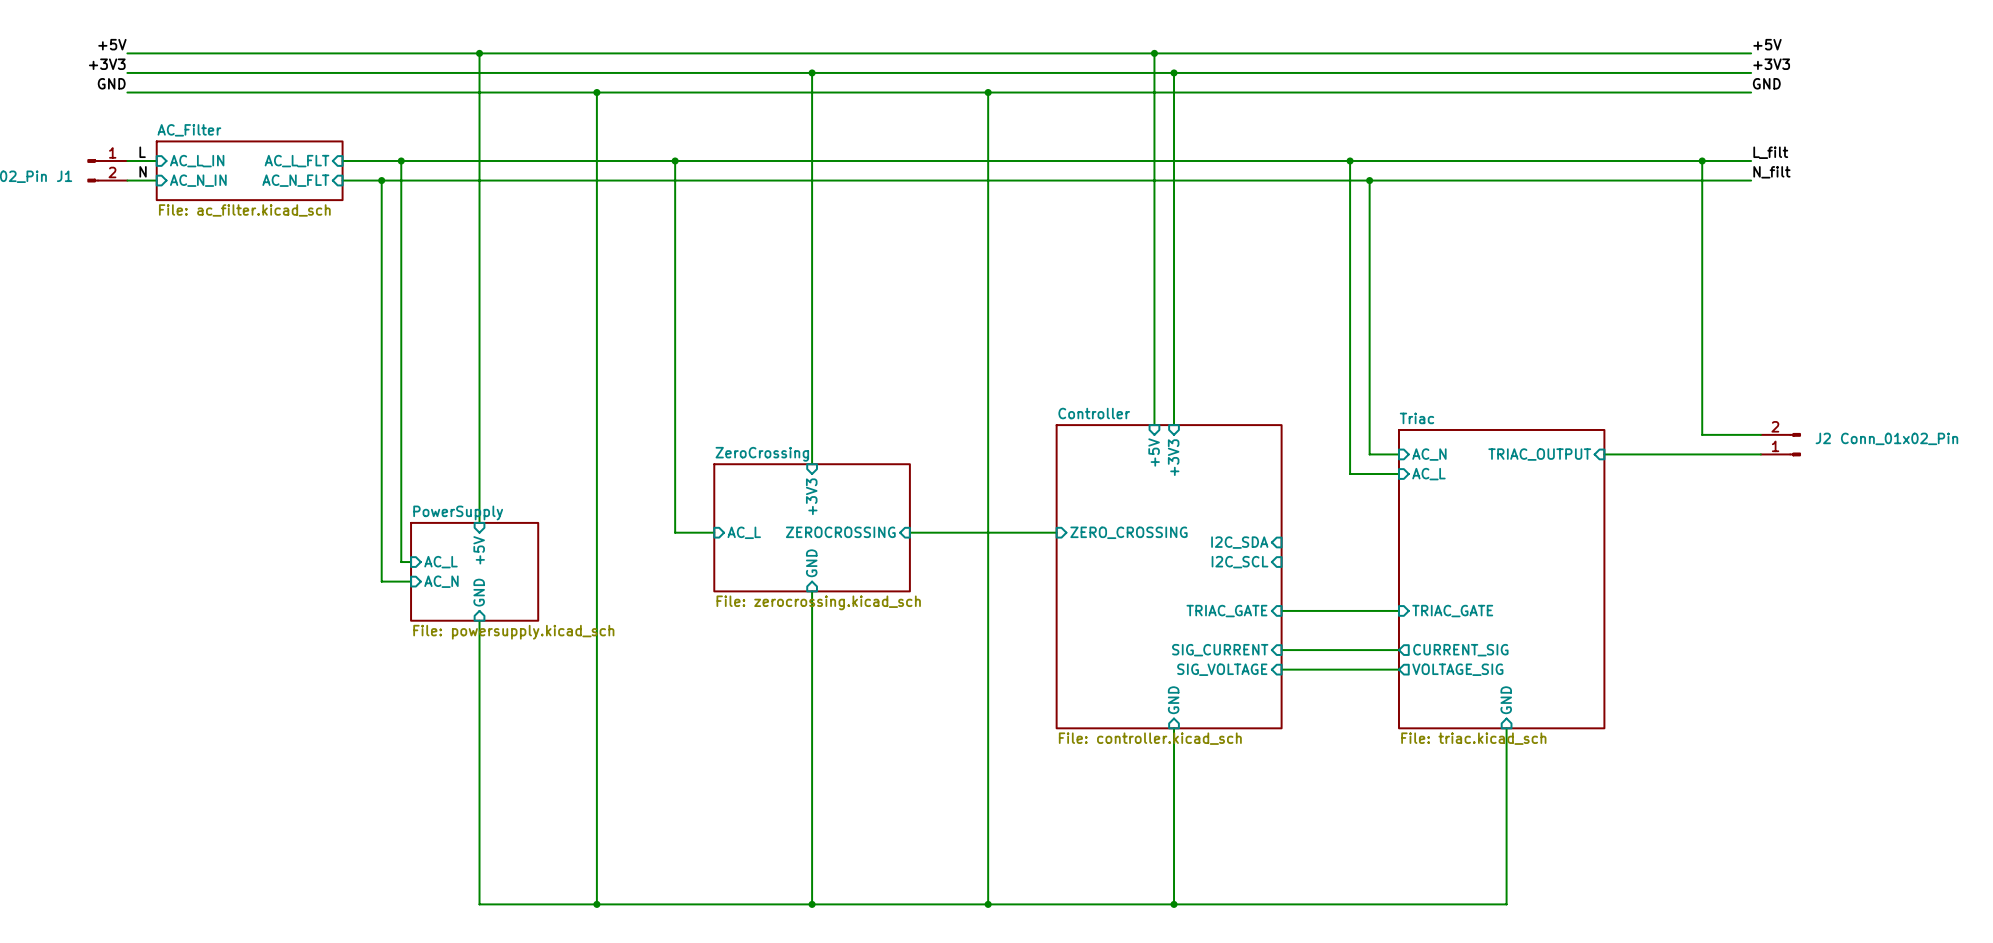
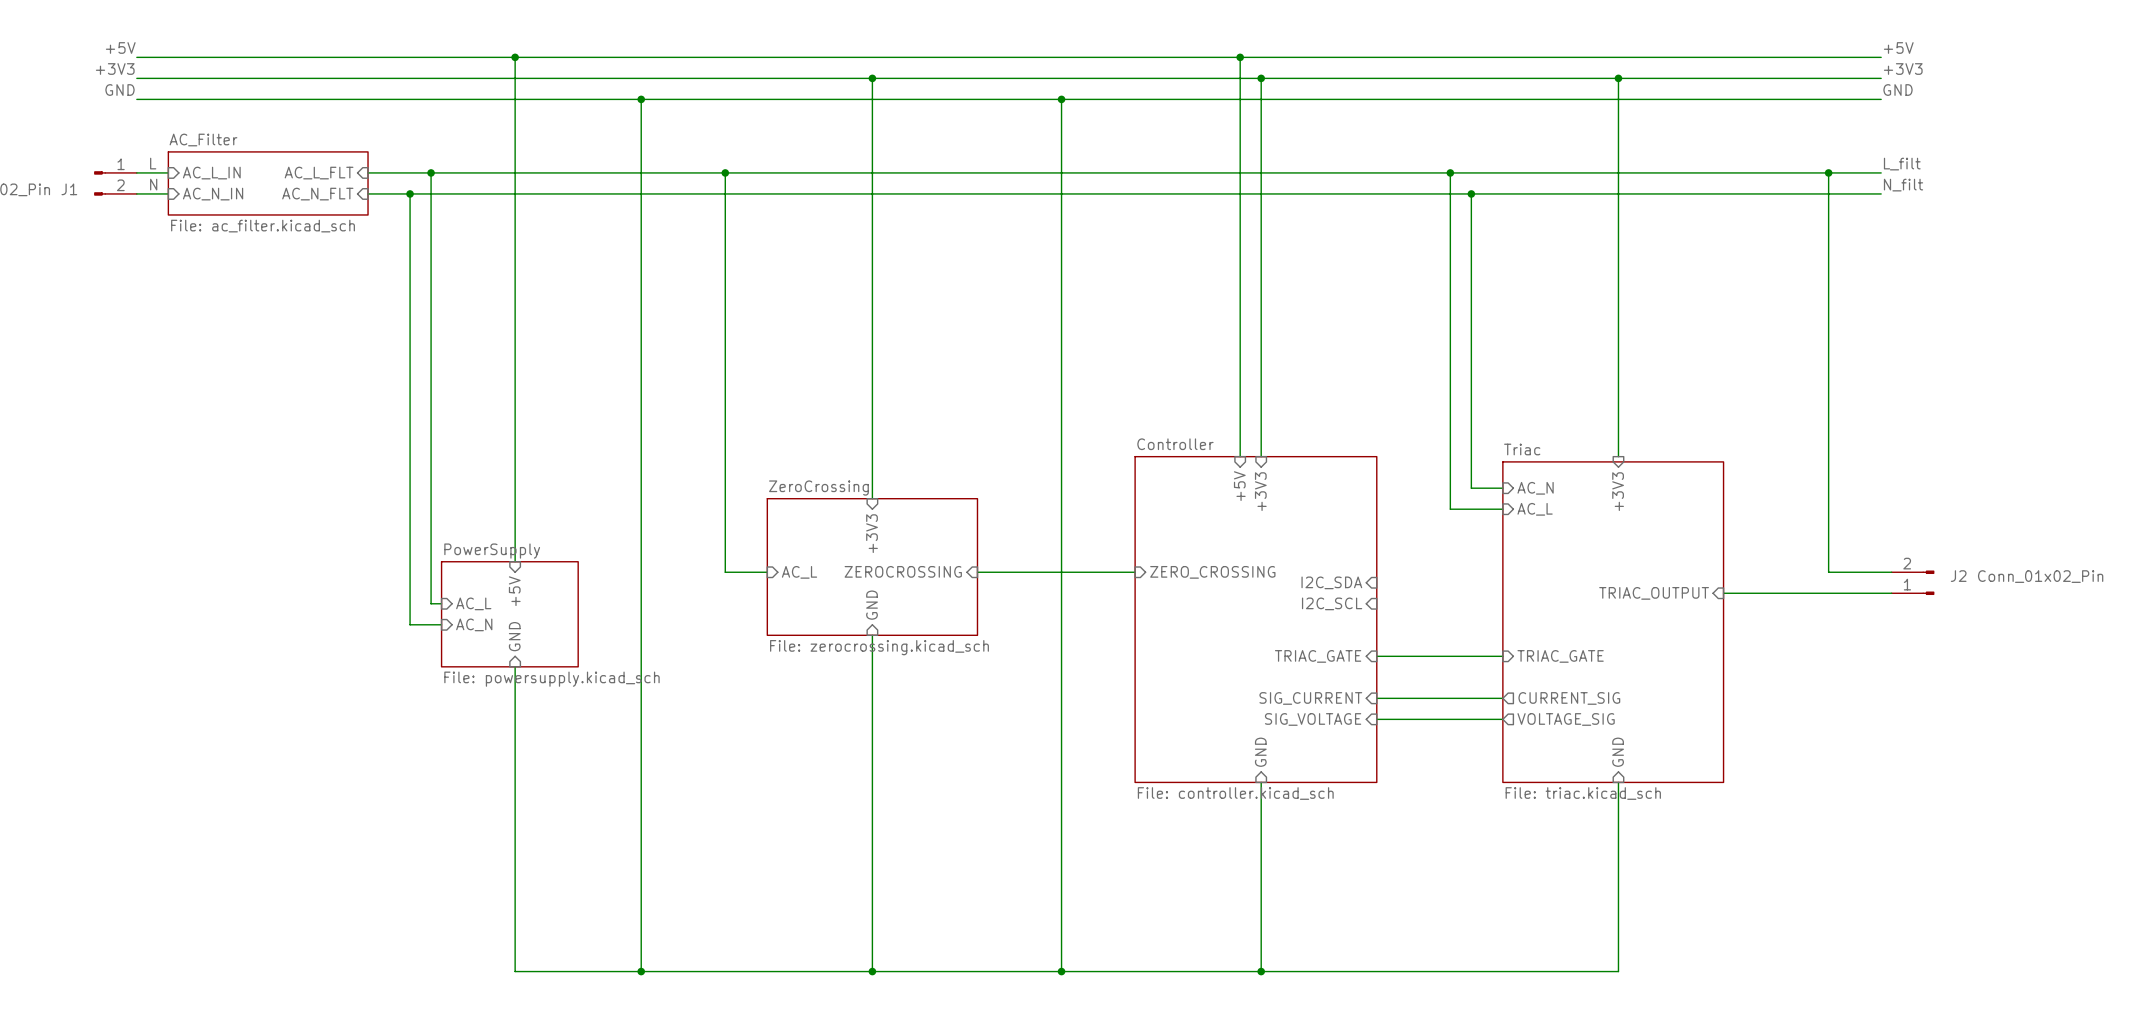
wire: none -> (1618, 78) (1618, 456)
junction: none -> (1618, 78)
wire: (1702, 434) (1760, 434) -> (1828, 467) (1828, 572) (1891, 572)
J2 position: (1780, 444) -> (1913, 582)
sheet pin position: TRIAC_OUTPUT (1539, 454) -> TRIAC_OUTPUT (1654, 593)
wire: (1604, 454) (1760, 454) -> (1723, 593) (1891, 593)
sheet pin: none -> +3V3 (1618, 491)

